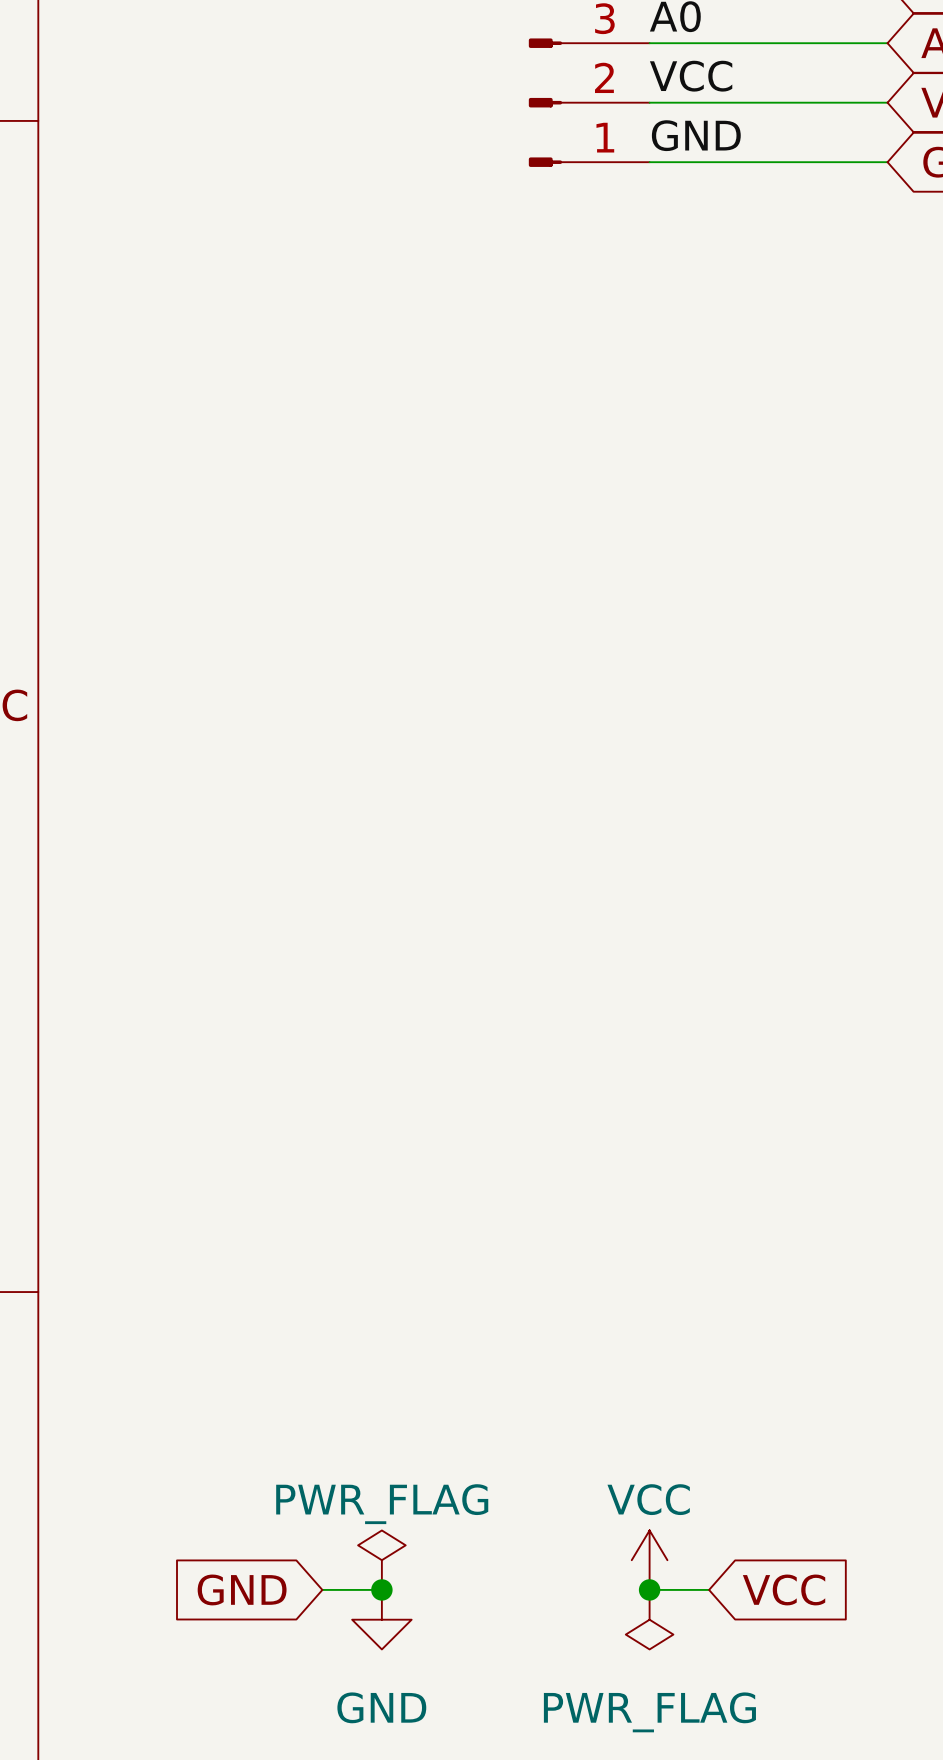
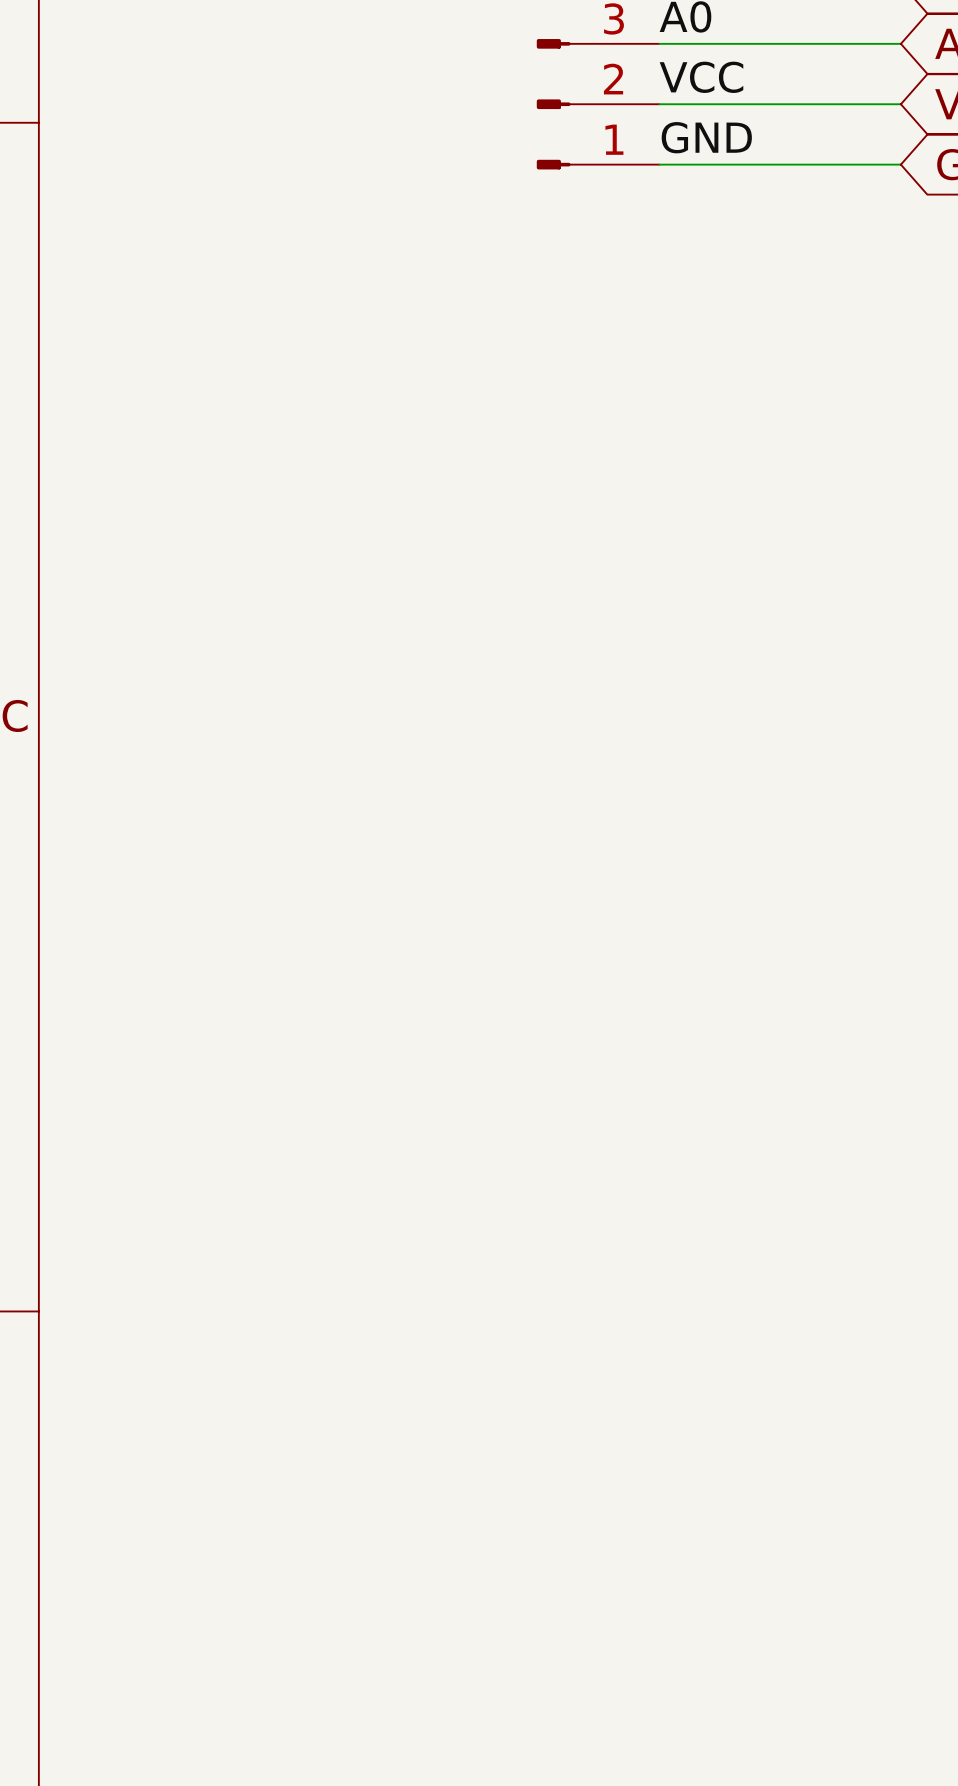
power symbol: PWR_FLAG (381, 1560) -> none
power symbol: VCC (649, 1560) -> none
global label: GND (242, 1589) -> none
wire: (322, 1589) (381, 1589) -> none
junction: (381, 1589) -> none
wire: (649, 1589) (709, 1589) -> none
junction: (649, 1589) -> none
global label: VCC (784, 1589) -> none
power symbol: GND (381, 1619) -> none
power symbol: PWR_FLAG (649, 1619) -> none

